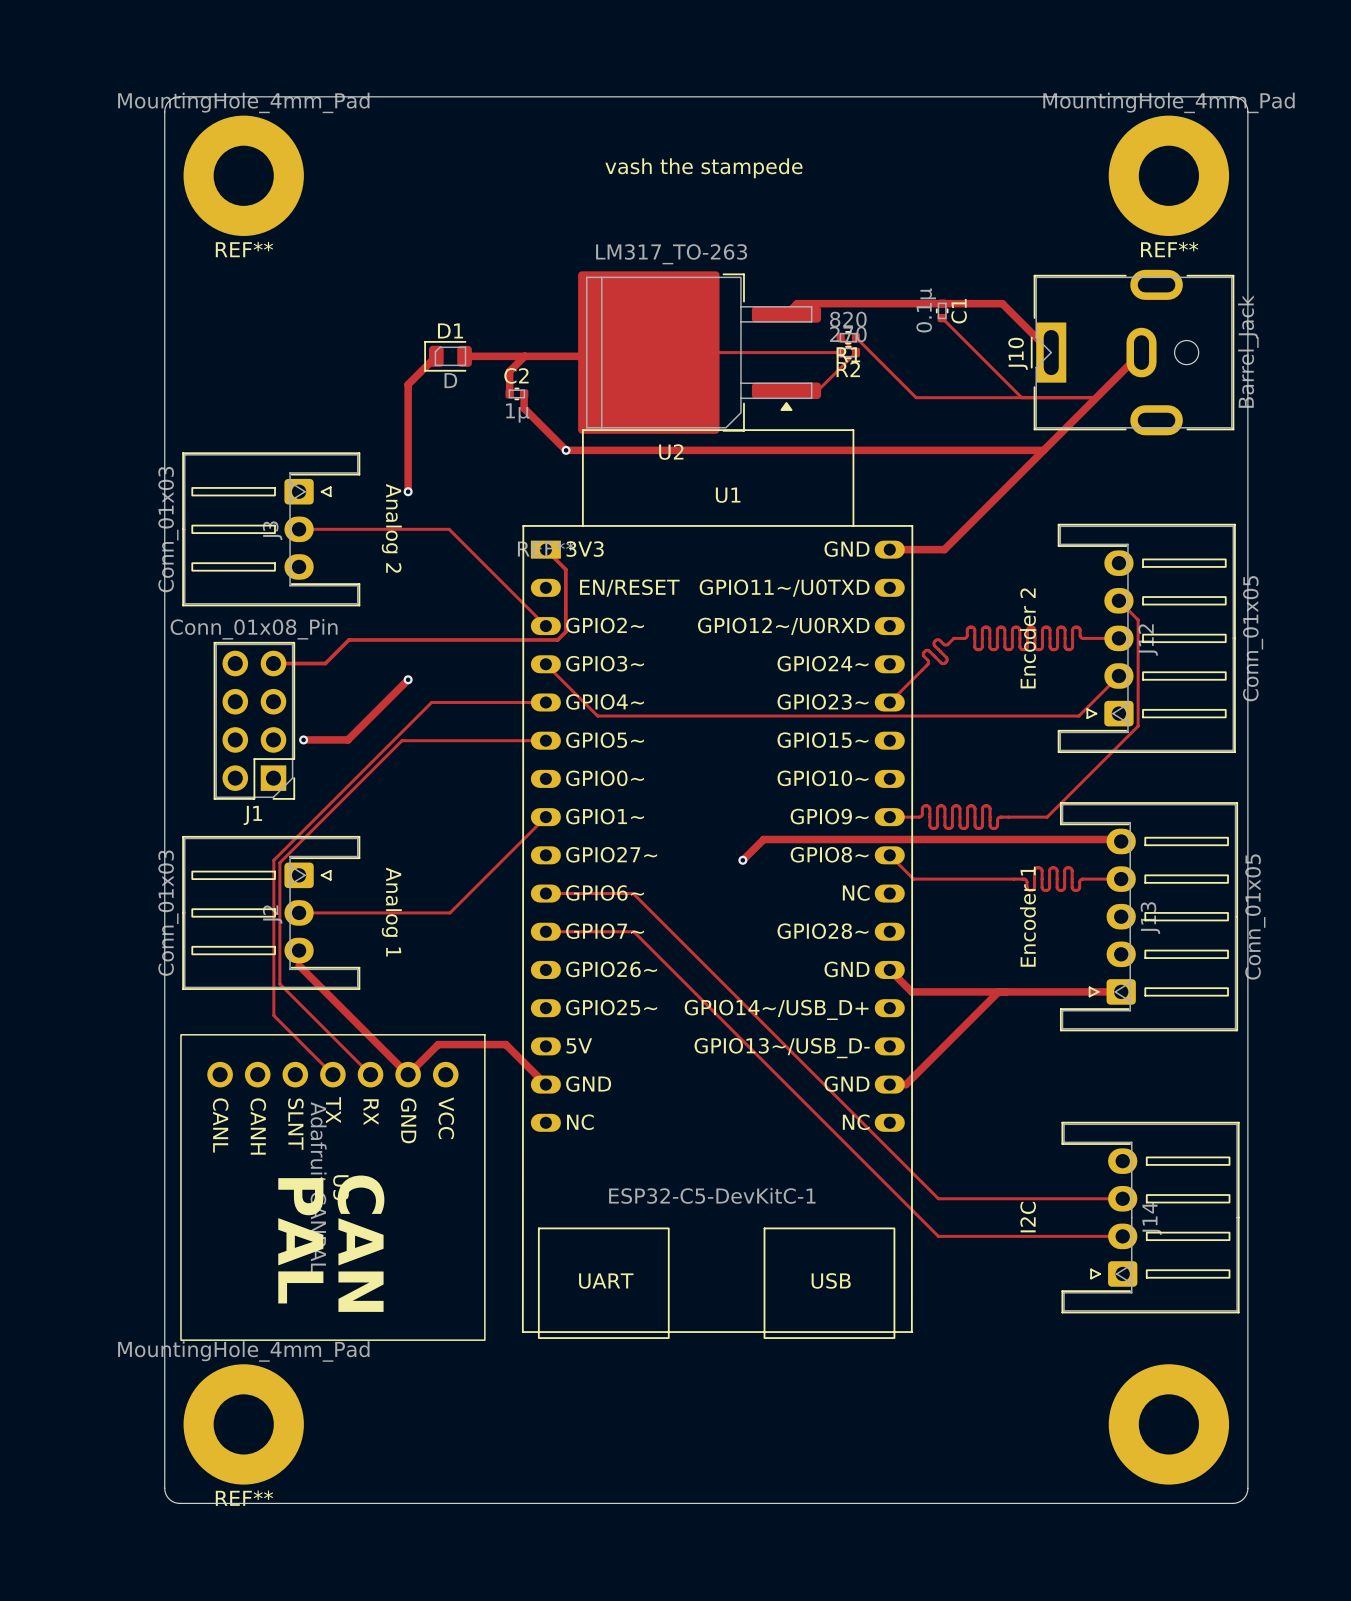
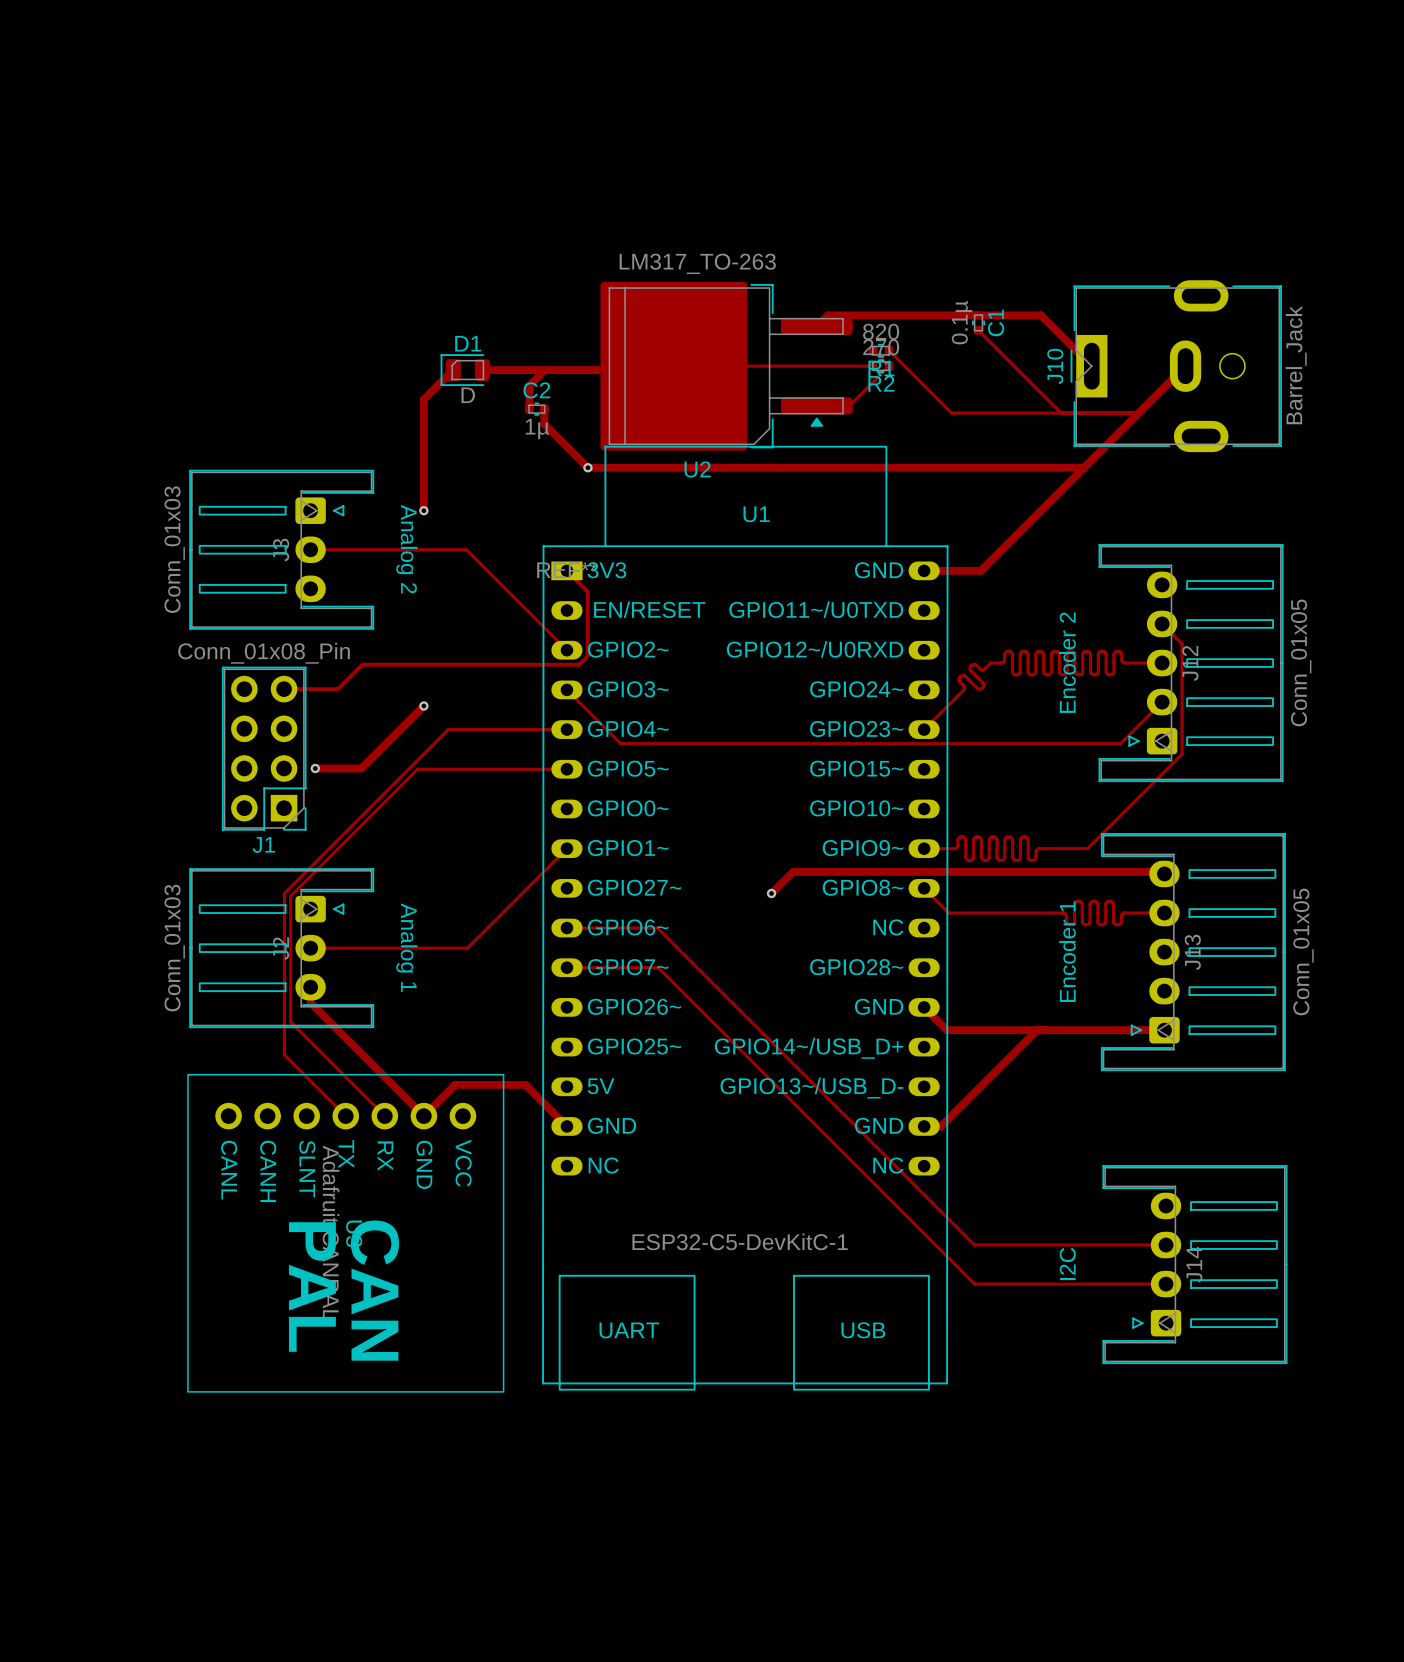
board edge: (179, 96) (1232, 96) (1244, 102) (1247, 111) (1247, 1488) (1242, 1500) (1232, 1503) (179, 1503) (168, 1497) (164, 1488) (164, 111) (169, 101) (179, 96) -> none
text: vash the stampede (703, 168) -> none
REF**: MountingHole_4mm_Pad (243, 175) -> none
REF**: MountingHole_4mm_Pad (1168, 175) -> none
REF**: MountingHole_4mm_Pad (243, 1424) -> none
part: (1168, 1424) -> none

